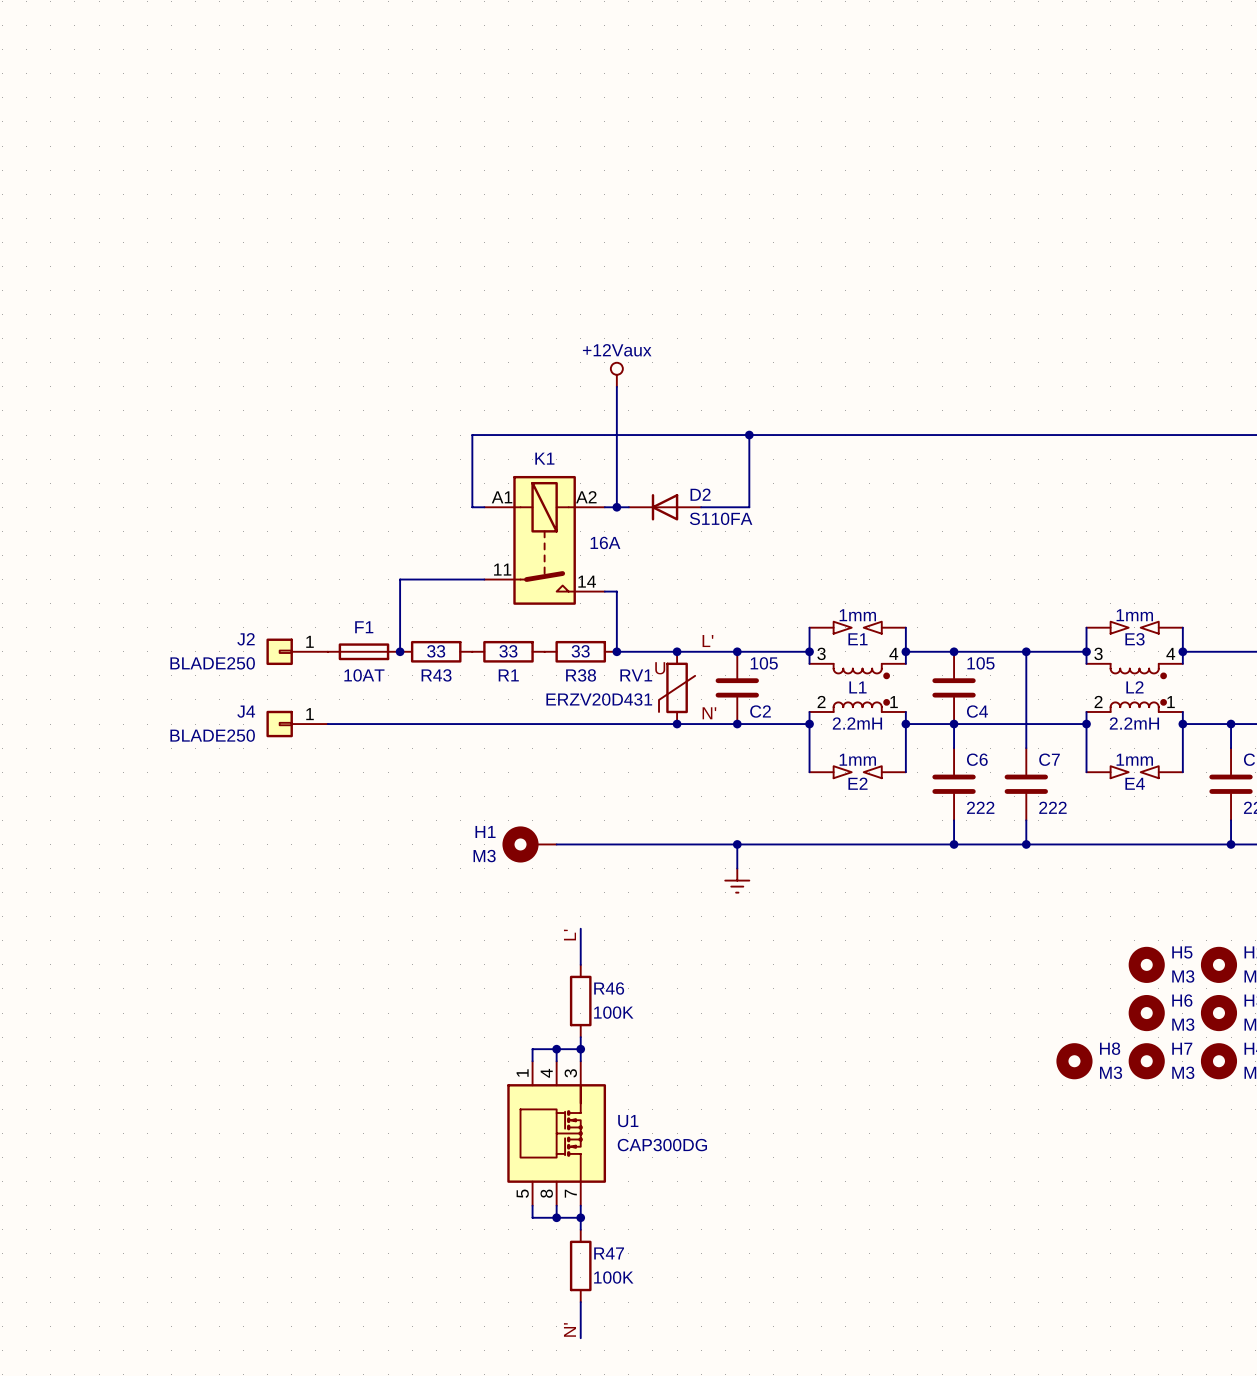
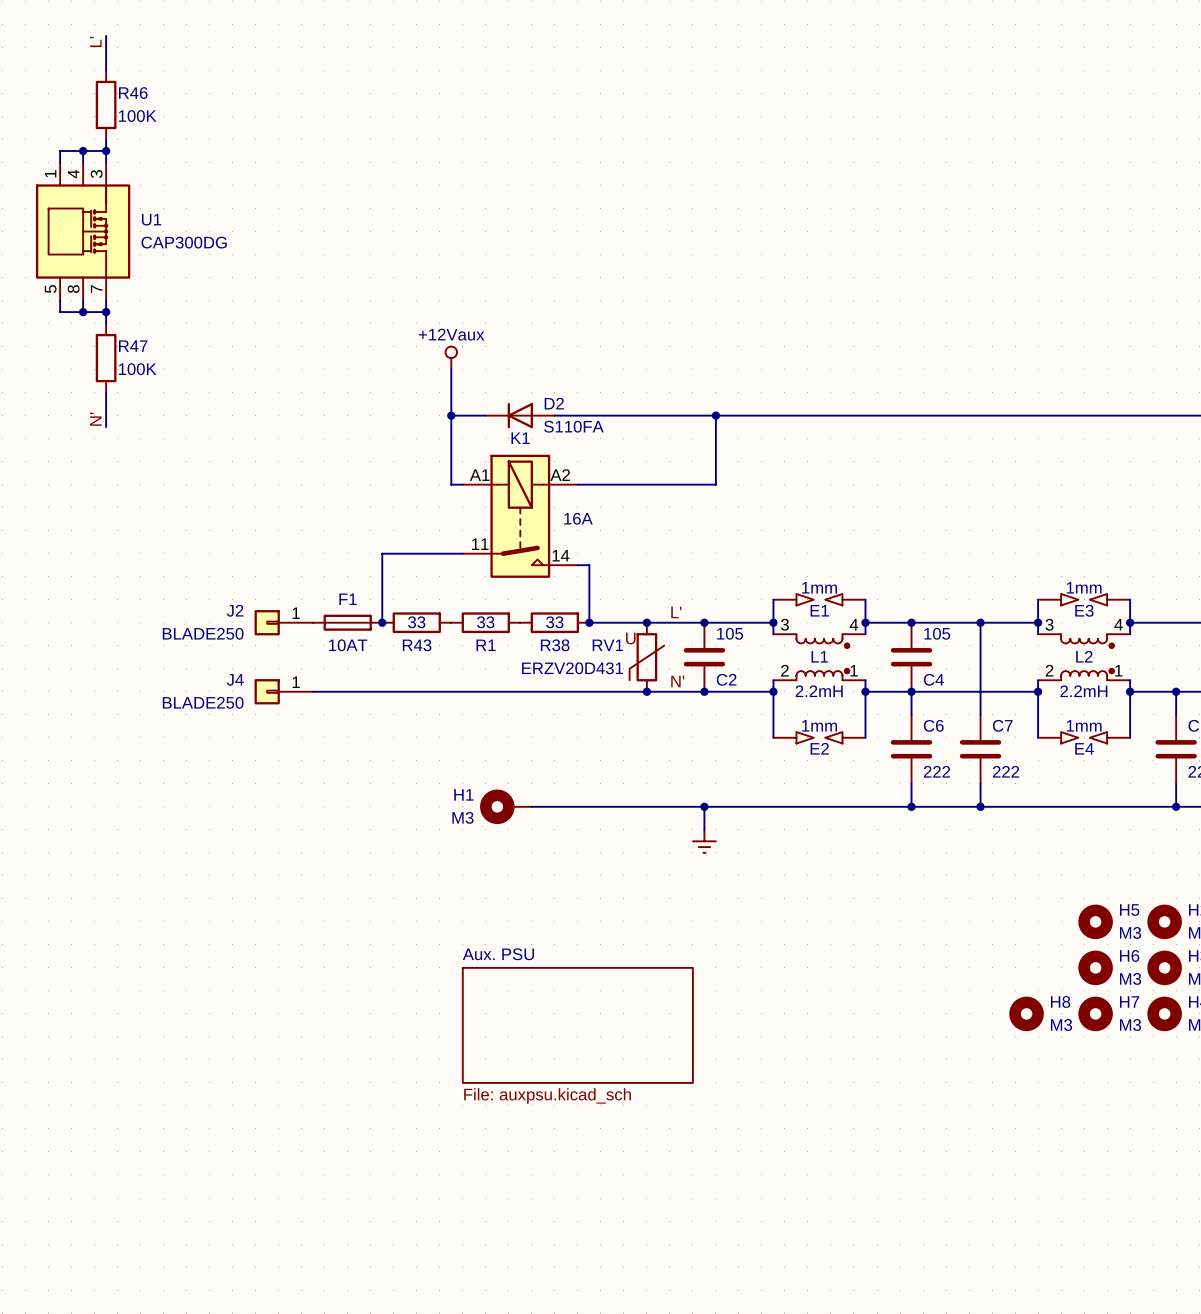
wire: none -> (106, 35) (106, 70)
label: none -> L' (95, 41)
wire: none -> (106, 139) (106, 162)
wire: none -> (83, 151) (83, 162)
junction: none -> (83, 151)
wire: none -> (106, 151) (60, 151) (60, 162)
junction: none -> (106, 151)
wire: none -> (60, 300) (60, 312) (106, 312)
wire: none -> (83, 300) (83, 312)
wire: none -> (106, 300) (106, 323)
junction: none -> (83, 312)
junction: none -> (106, 312)
power symbol position: +12Vaux (616, 374) -> +12Vaux (451, 358)
wire: none -> (451, 369) (451, 415)
wire: (616, 386) (616, 507) -> none
wire: none -> (106, 392) (106, 427)
junction: none -> (451, 415)
label: none -> N' (95, 419)
junction: (616, 507) -> none
D2 position: (665, 507) -> (520, 415)
wire: (580, 928) (580, 964) -> none
label: L' (569, 935) -> none
R46 position: (580, 1001) -> (106, 104)
wire: (580, 1037) (580, 1061) -> none
wire: (556, 1049) (556, 1061) -> none
junction: (556, 1049) -> none
wire: (580, 1049) (532, 1049) (532, 1061) -> none
junction: (580, 1049) -> none
sheet Aux. PSU: none -> File: auxpsu.kicad_sch (577, 1025)
U1 position: (556, 1133) -> (83, 231)
wire: (532, 1205) (532, 1217) (580, 1217) -> none
wire: (556, 1205) (556, 1217) -> none
wire: (580, 1205) (580, 1229) -> none
junction: (556, 1217) -> none
junction: (580, 1217) -> none
R47 position: (580, 1265) -> (106, 358)
wire: (580, 1302) (580, 1338) -> none
label: N' (569, 1329) -> none

